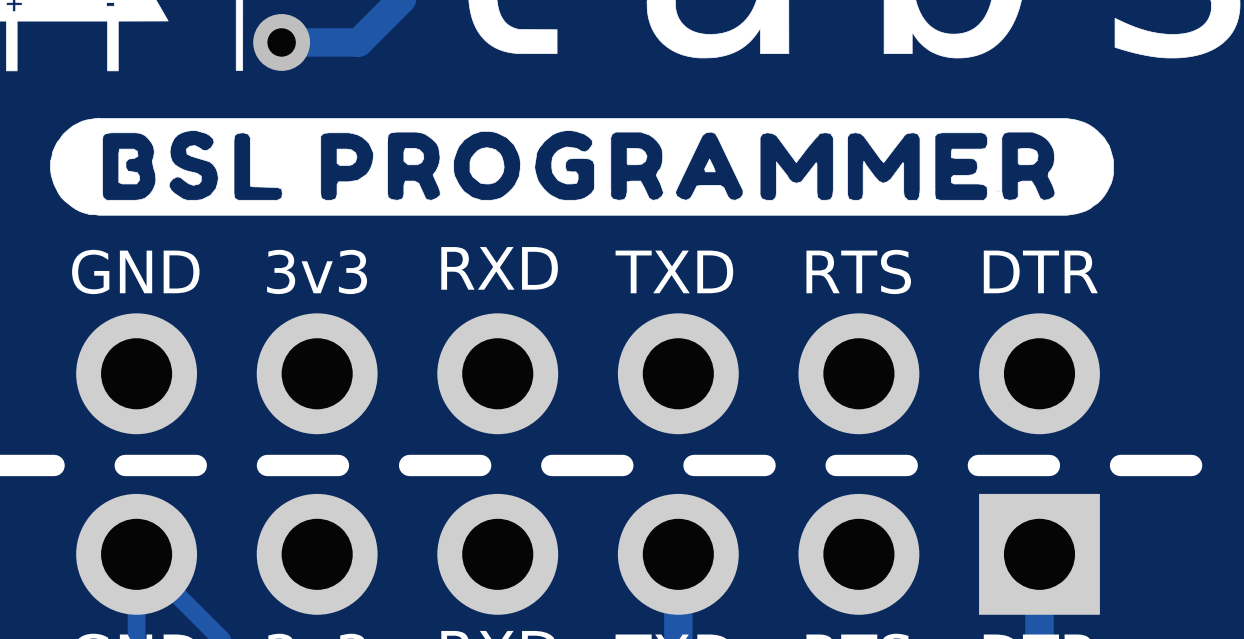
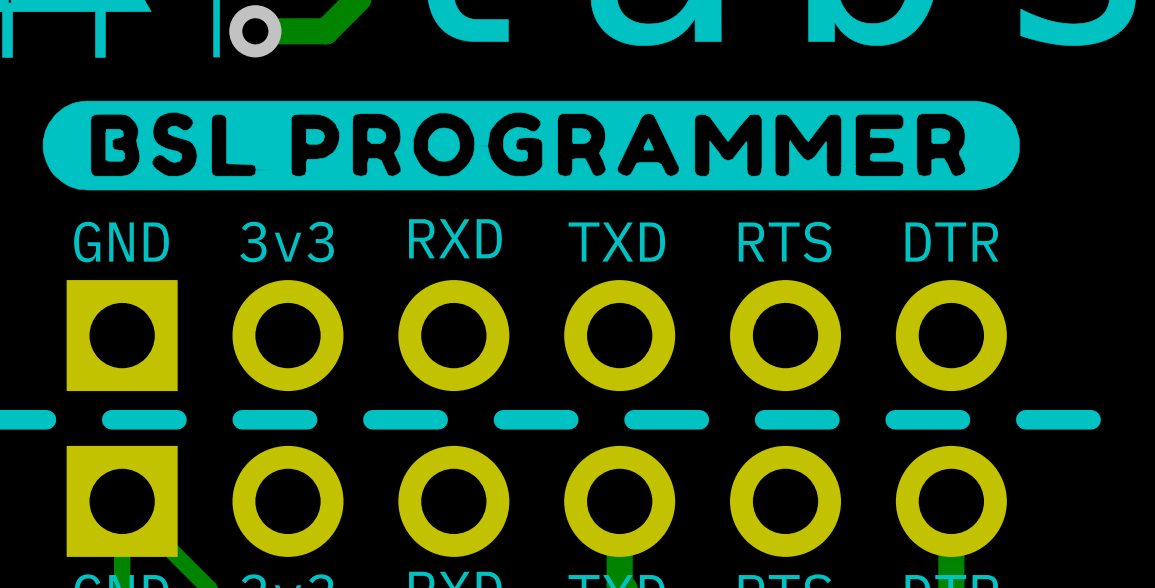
part footprint: [76, 313, 1100, 615] -> [66, 280, 1007, 557]

